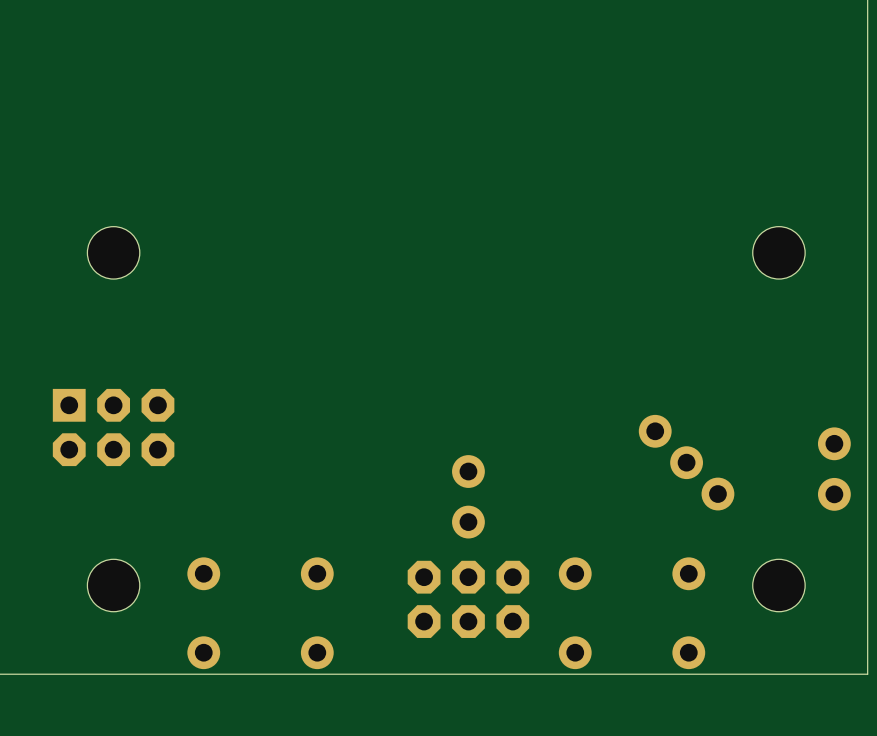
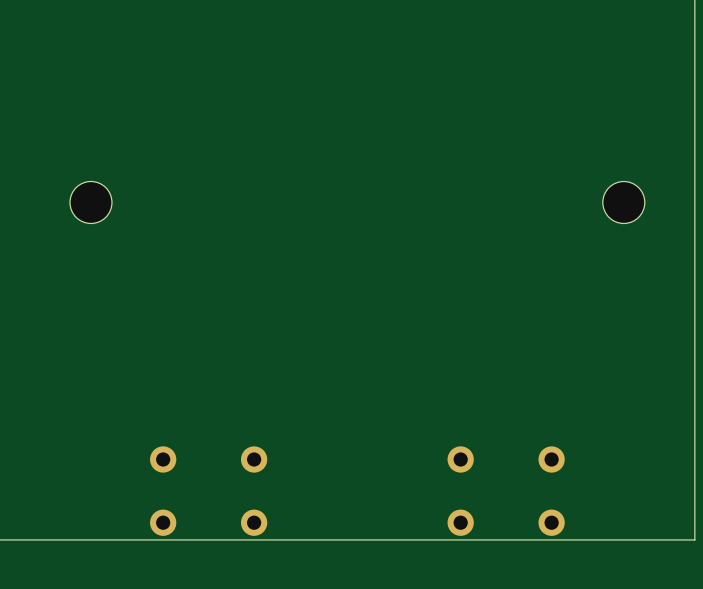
part: (113, 427) -> none
part: (686, 462) -> none
part: (834, 469) -> none
part: (468, 496) -> none
part: (113, 585) -> none
part: (778, 585) -> none
part: (468, 599) -> none

